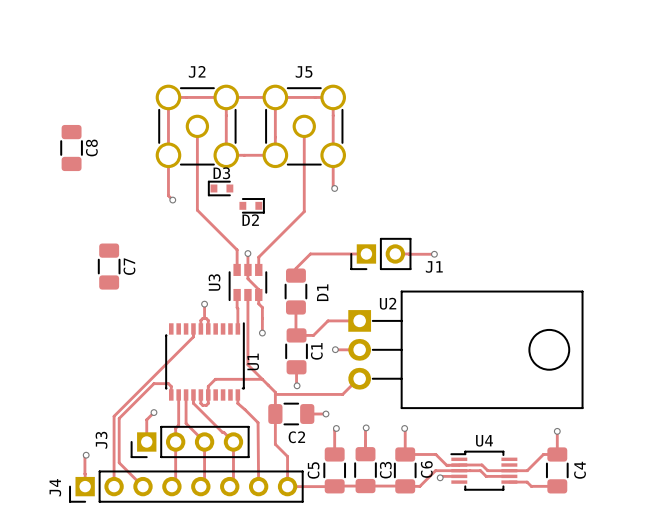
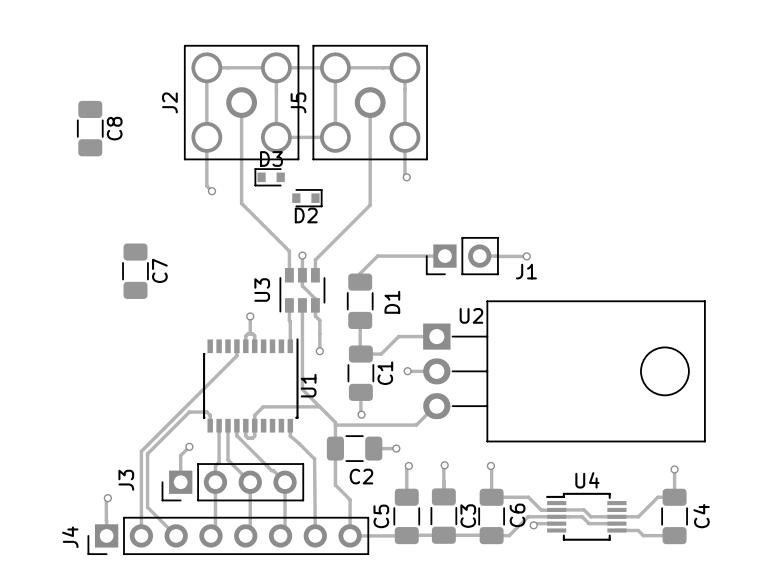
J2 name position: J2 (197, 71) -> J2 (169, 102)
J5 name position: J5 (304, 71) -> J5 (298, 102)
J2 footprint: [155, 84, 240, 169] -> [183, 44, 300, 161]
J5 footprint: [262, 84, 346, 169] -> [312, 44, 428, 161]

